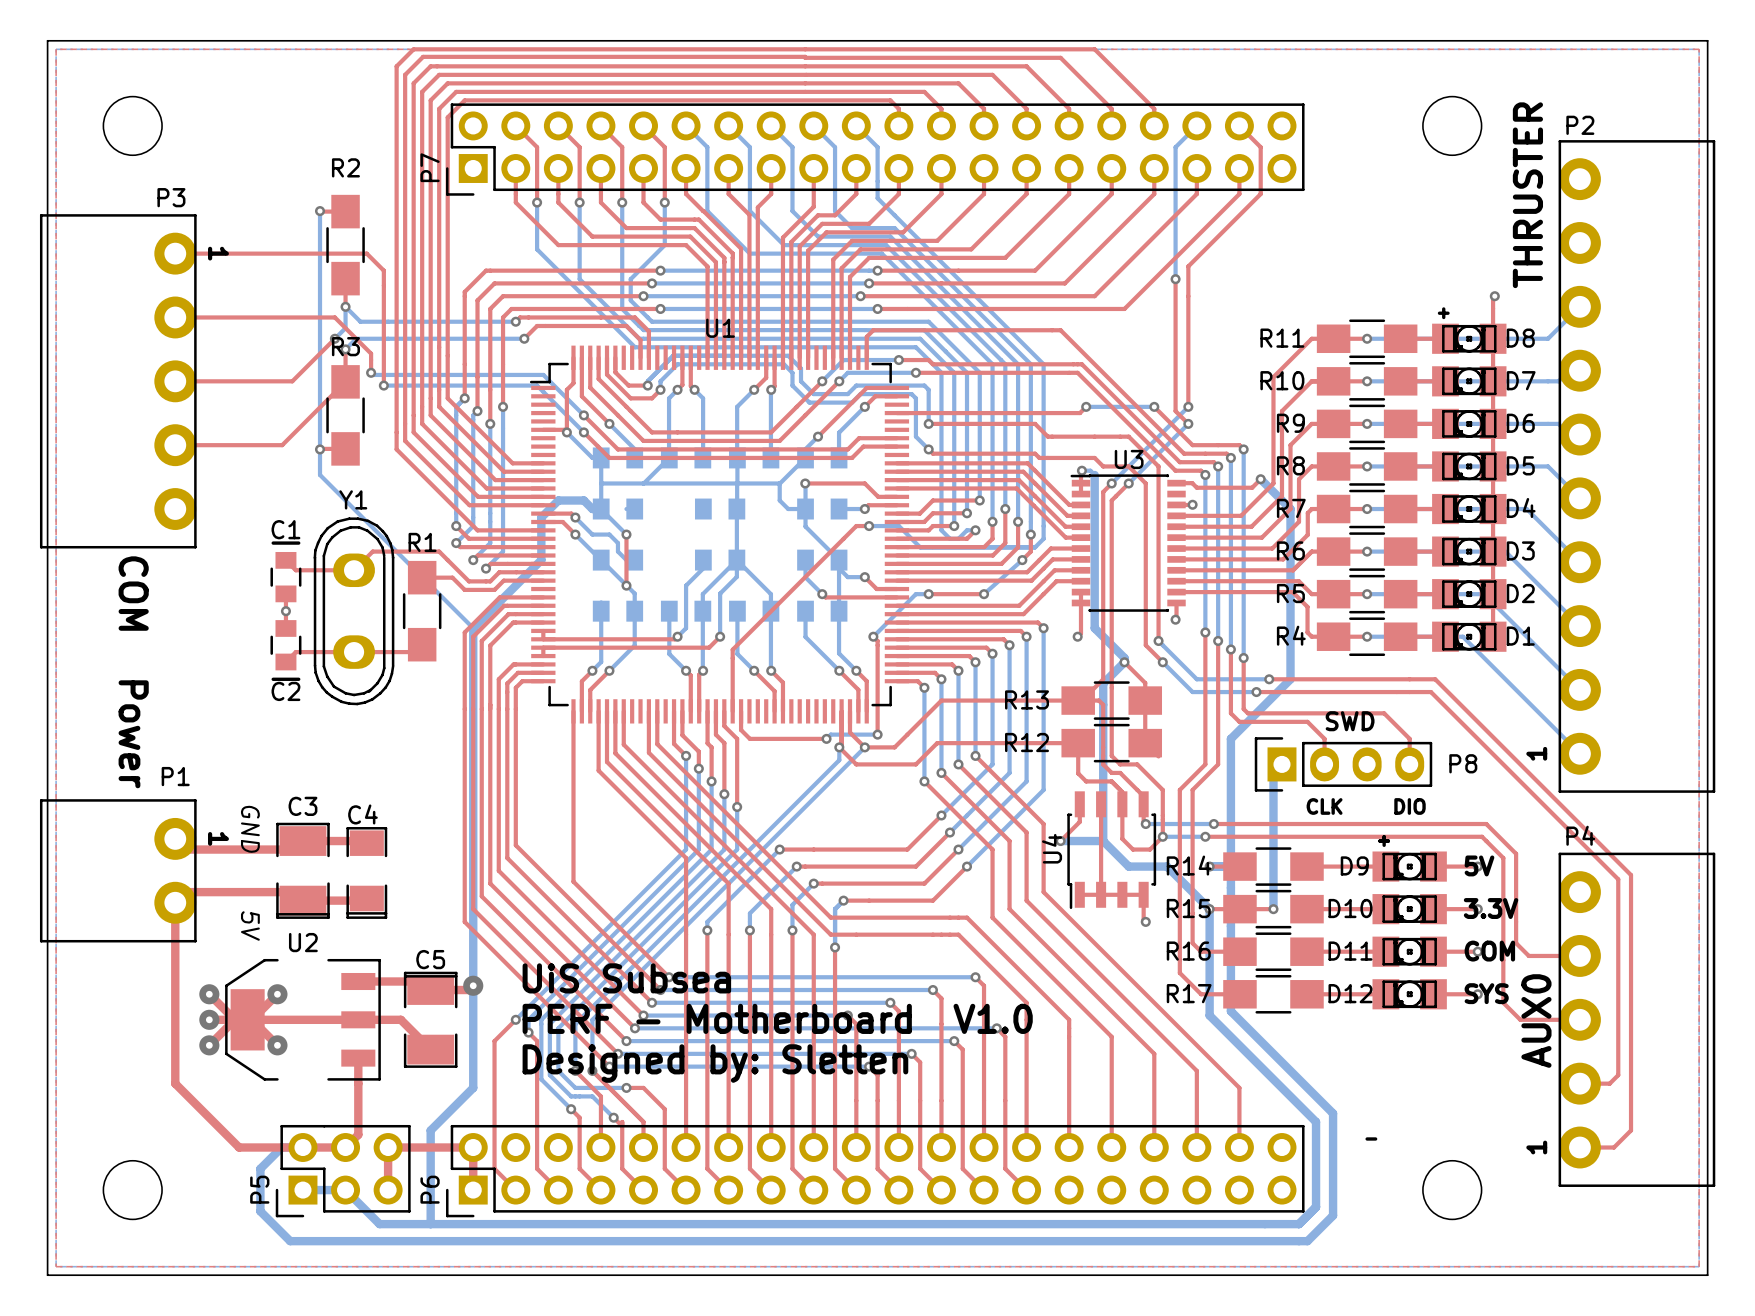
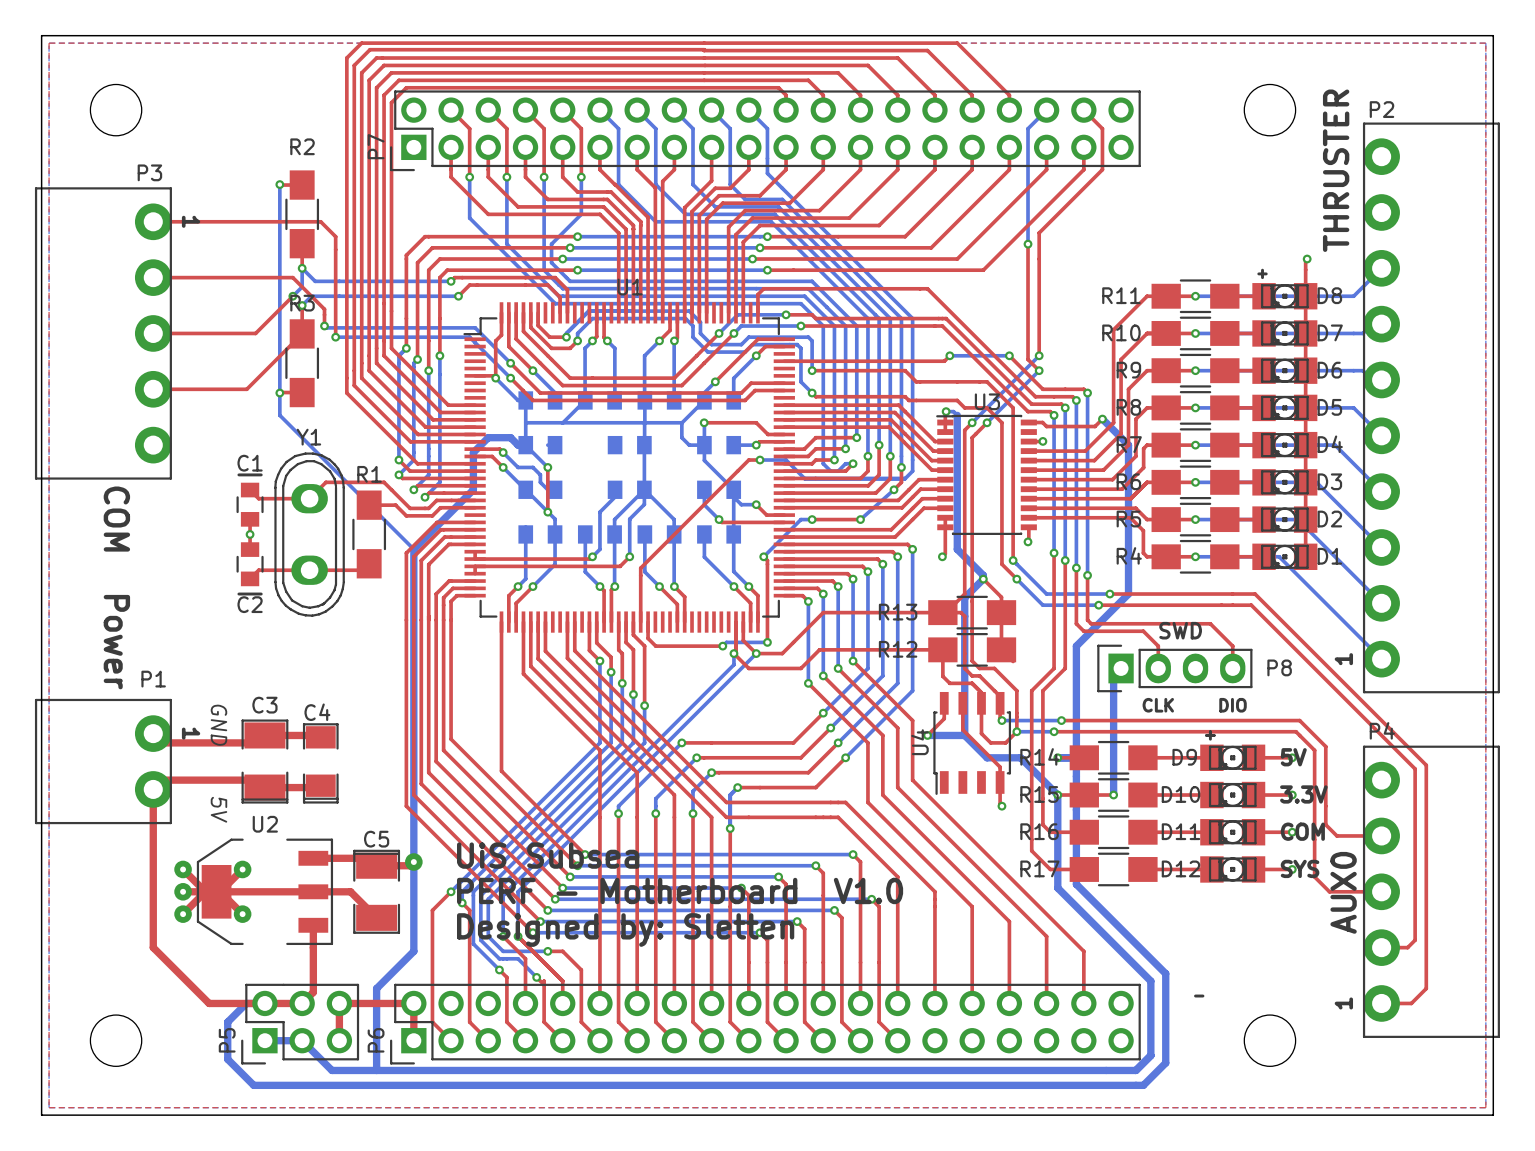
top track: (1101, 834) (1101, 894) -> (962, 729) (1000, 767) (1000, 782)
top track: (1079, 894) (1143, 894) -> none

